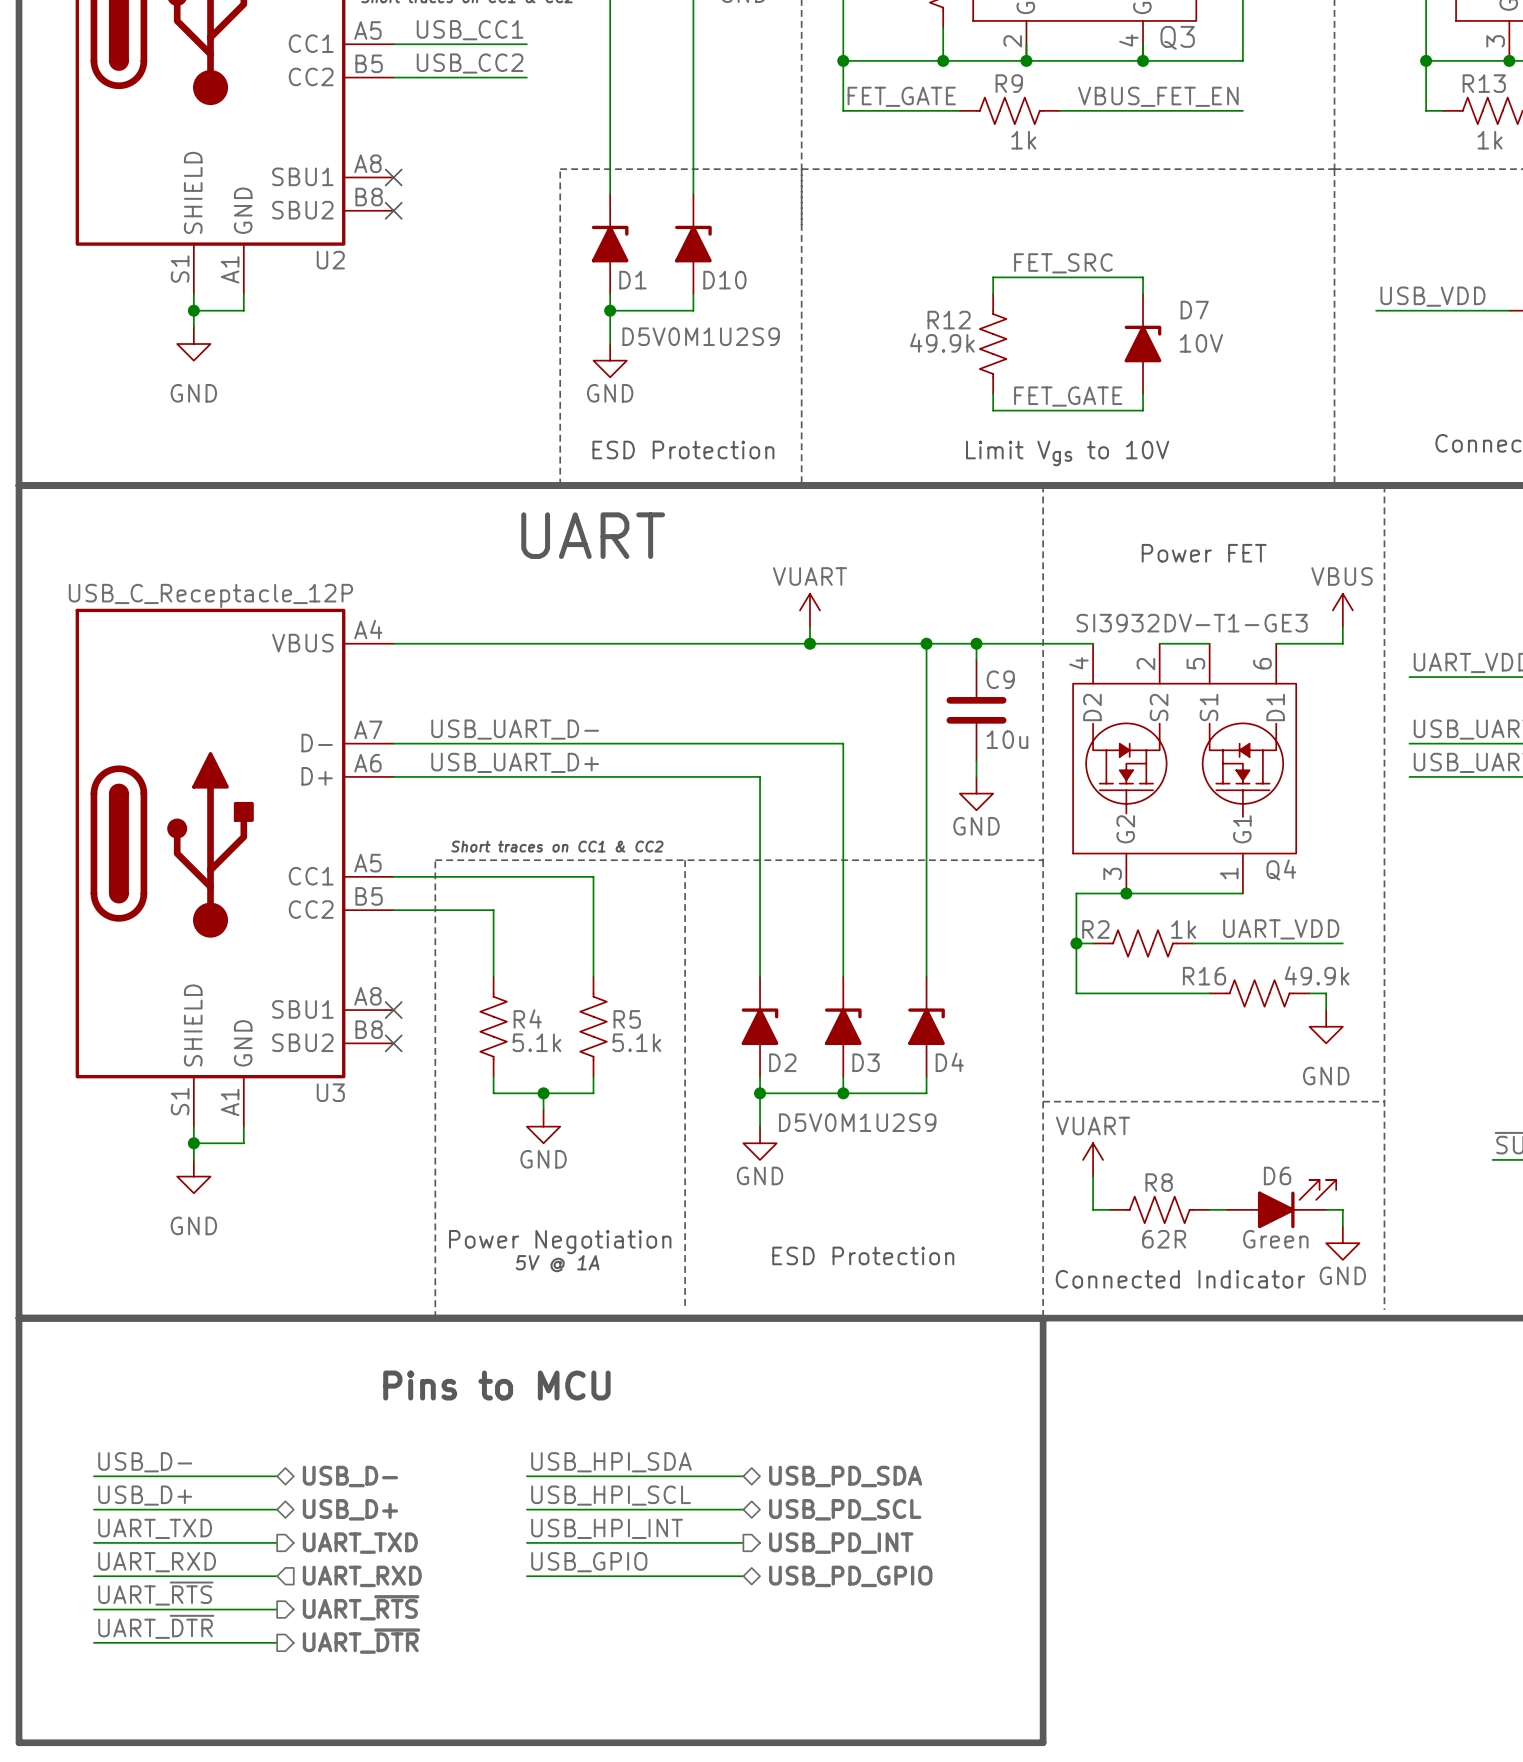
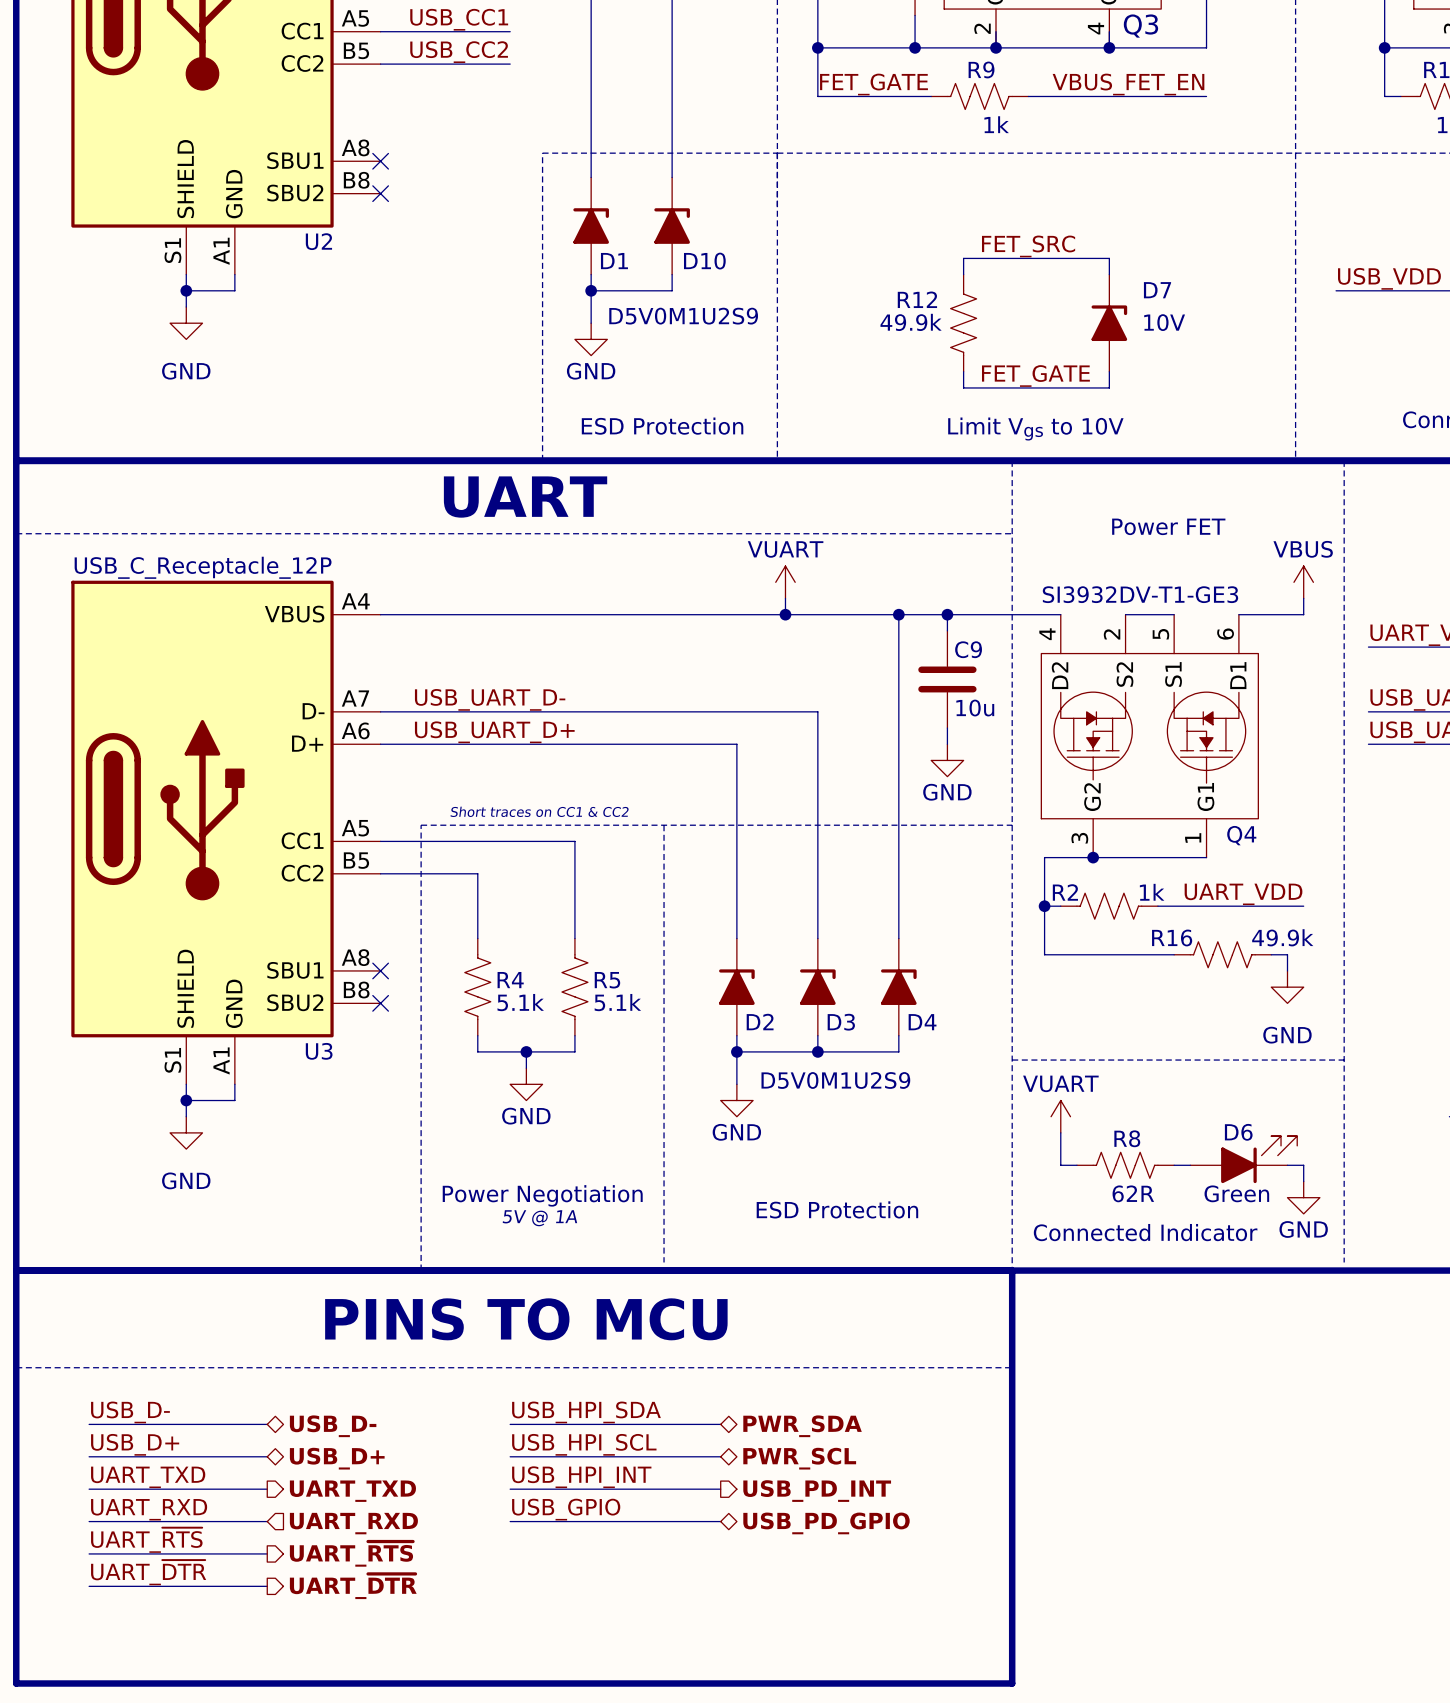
text position: UART (593, 535) -> UART (525, 497)
line: none -> (16, 533) (1012, 533)
text: none -> PINS TO MCU (526, 1319)
text: Pins to MCU (496, 1385) -> none
line: none -> (16, 1367) (1012, 1367)
hierarchical label: USB_PD_SDA (845, 1476) -> PWR_SDA (802, 1426)
hierarchical label: USB_PD_SCL (845, 1509) -> PWR_SCL (799, 1458)

